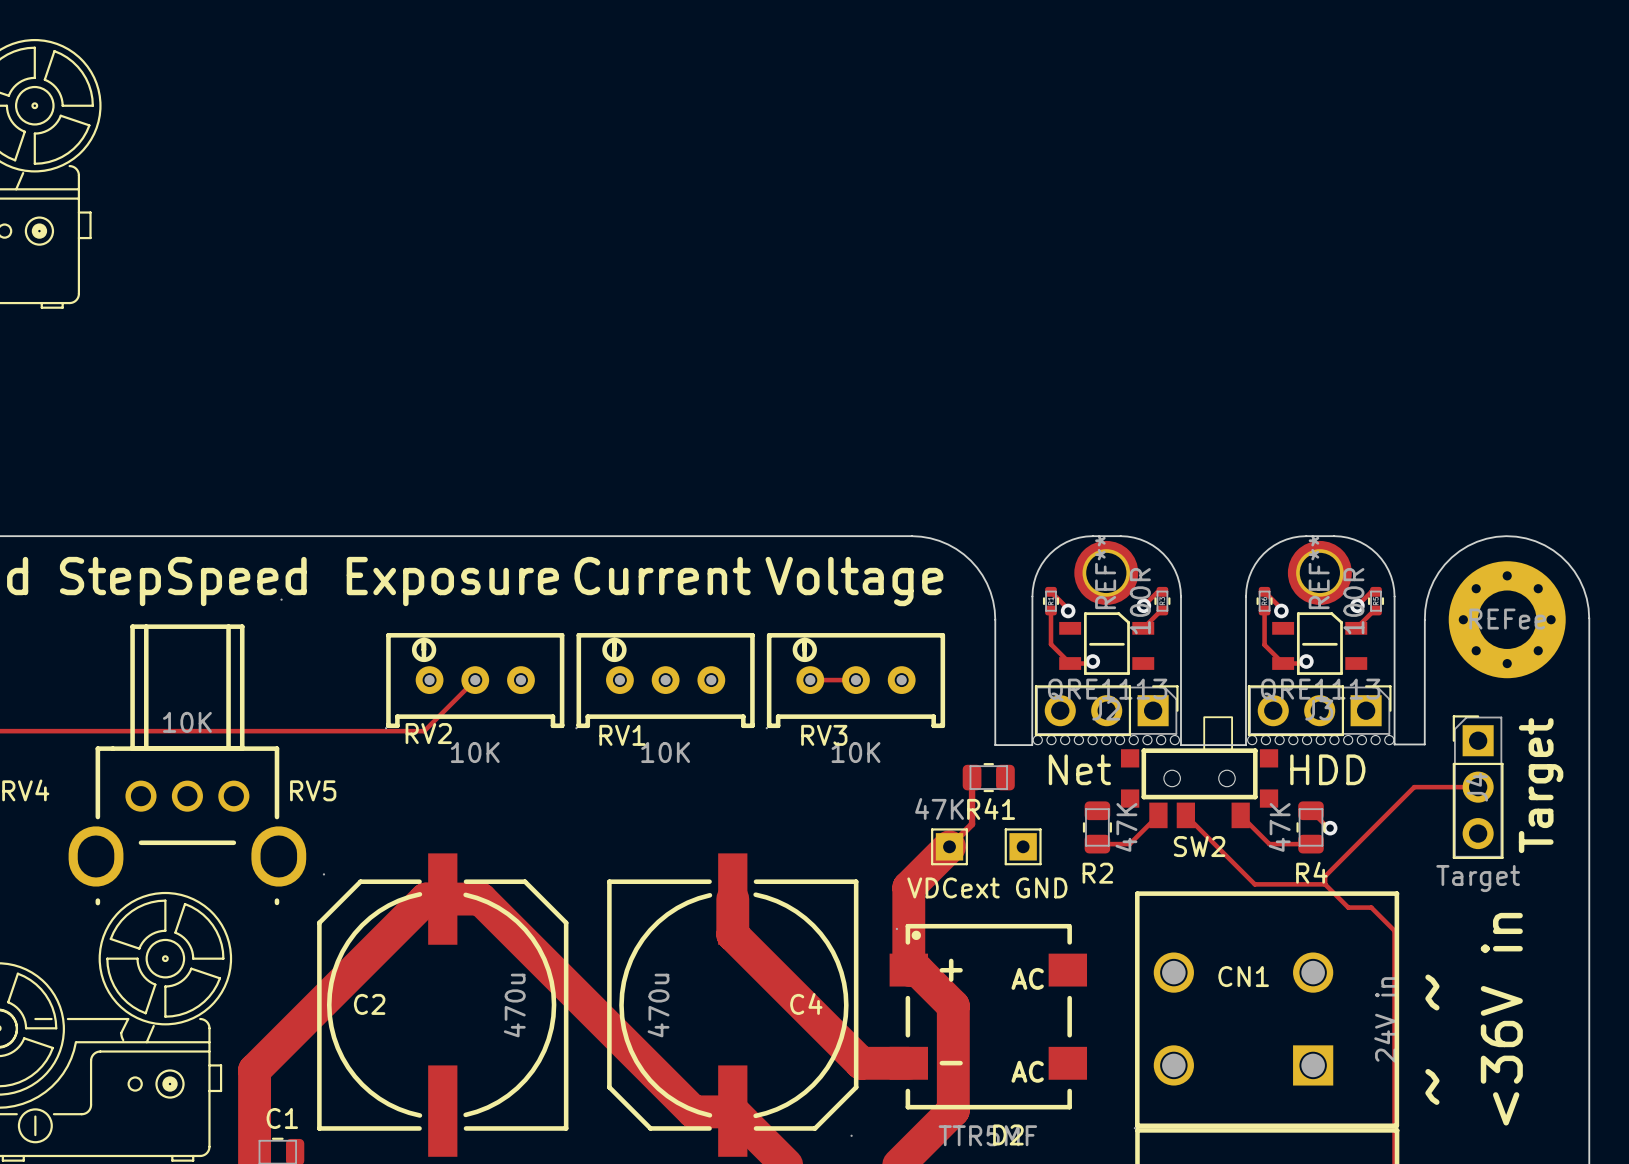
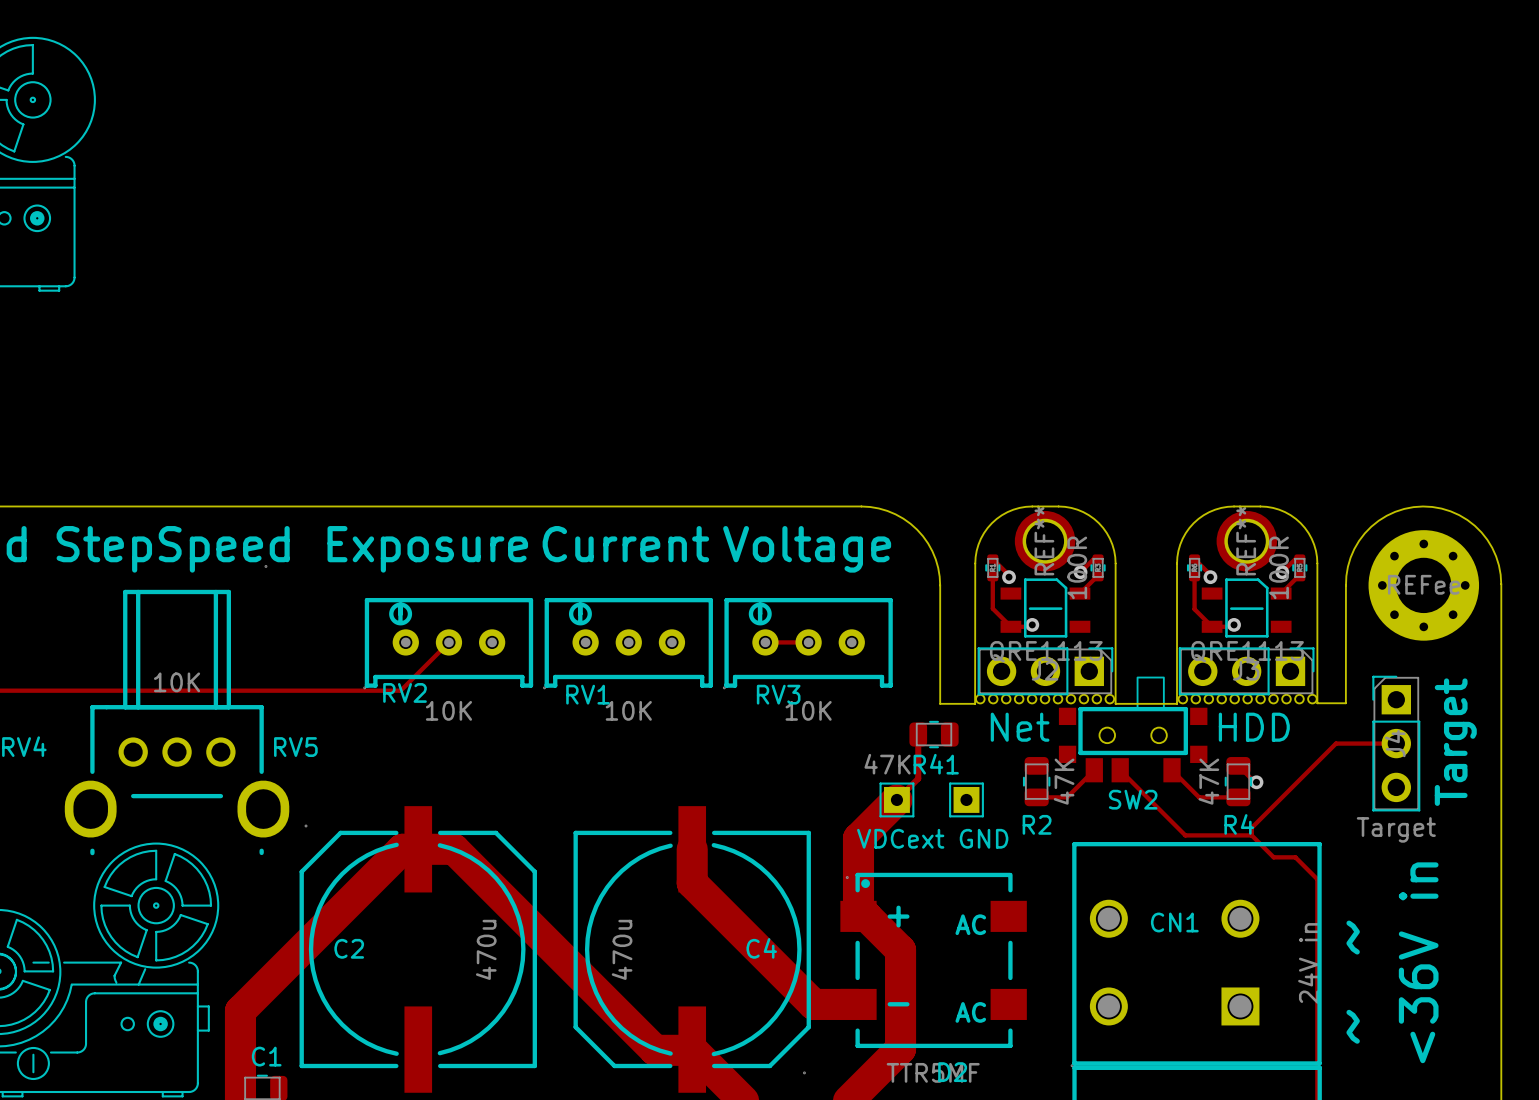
line: (54, 51) (44, 79) (57, 89) (62, 105) (92, 105) (88, 84) (82, 72) (67, 57) (54, 51) -> none
line: (60, 115) (89, 125) (86, 131) (73, 148) (62, 156) (48, 162) (34, 163) (34, 133) (50, 128) (60, 115) -> none
line: (23, 173) (16, 189) -> none
line: (78, 212) (90, 212) (90, 238) (78, 238) -> none

